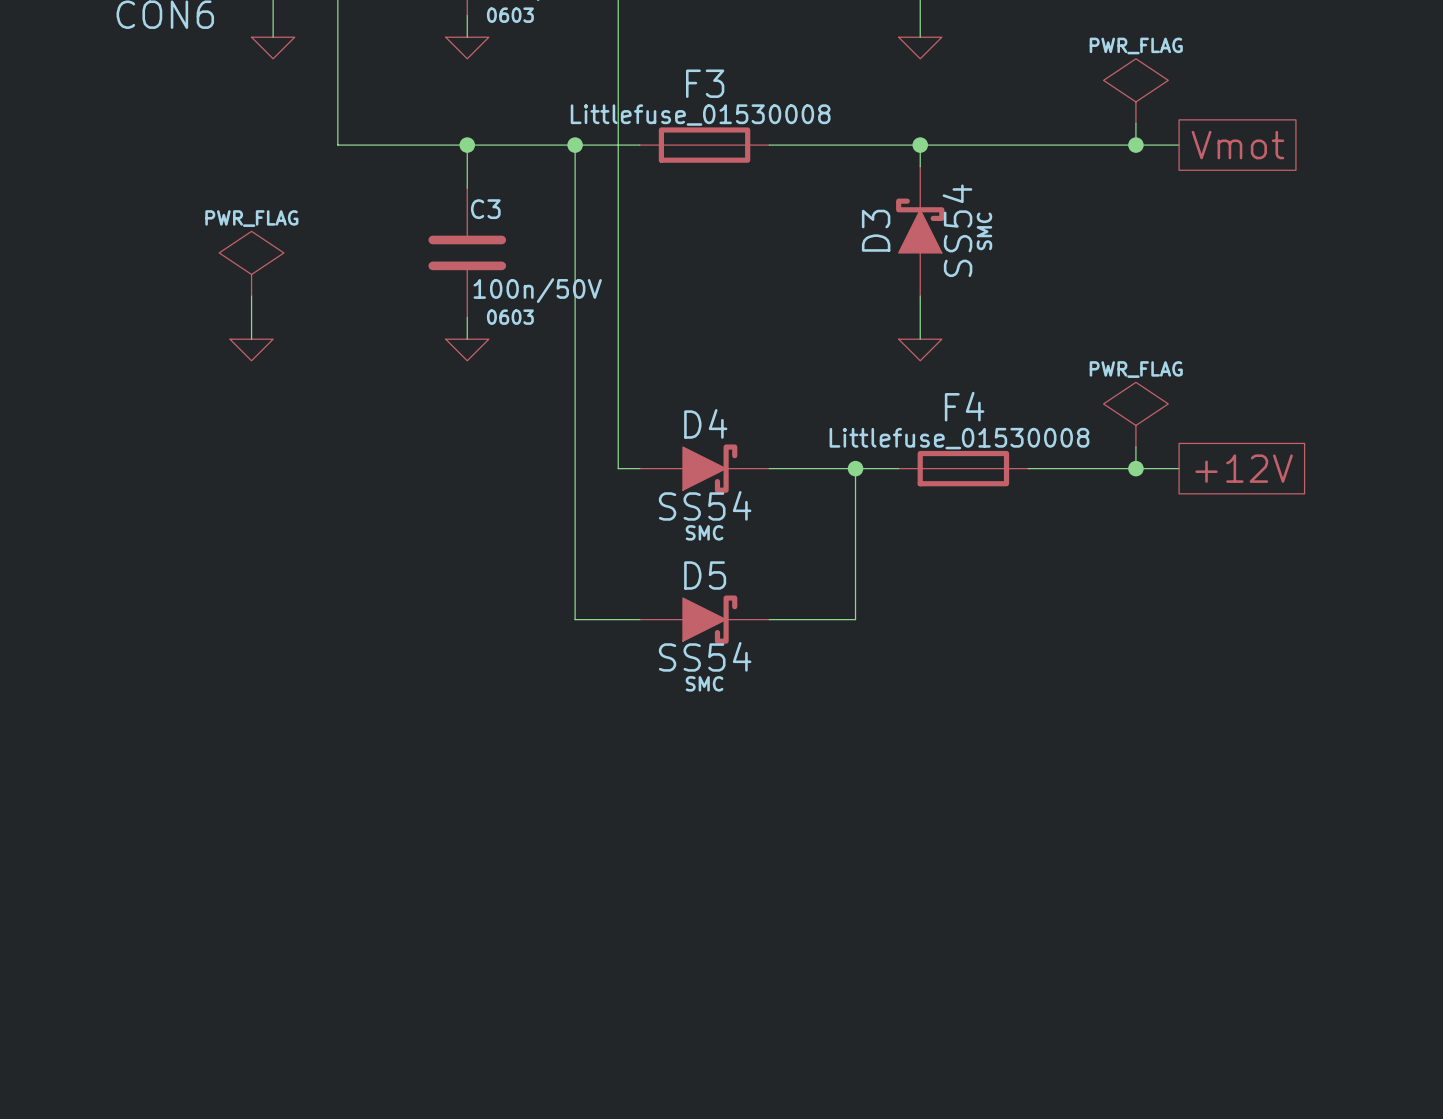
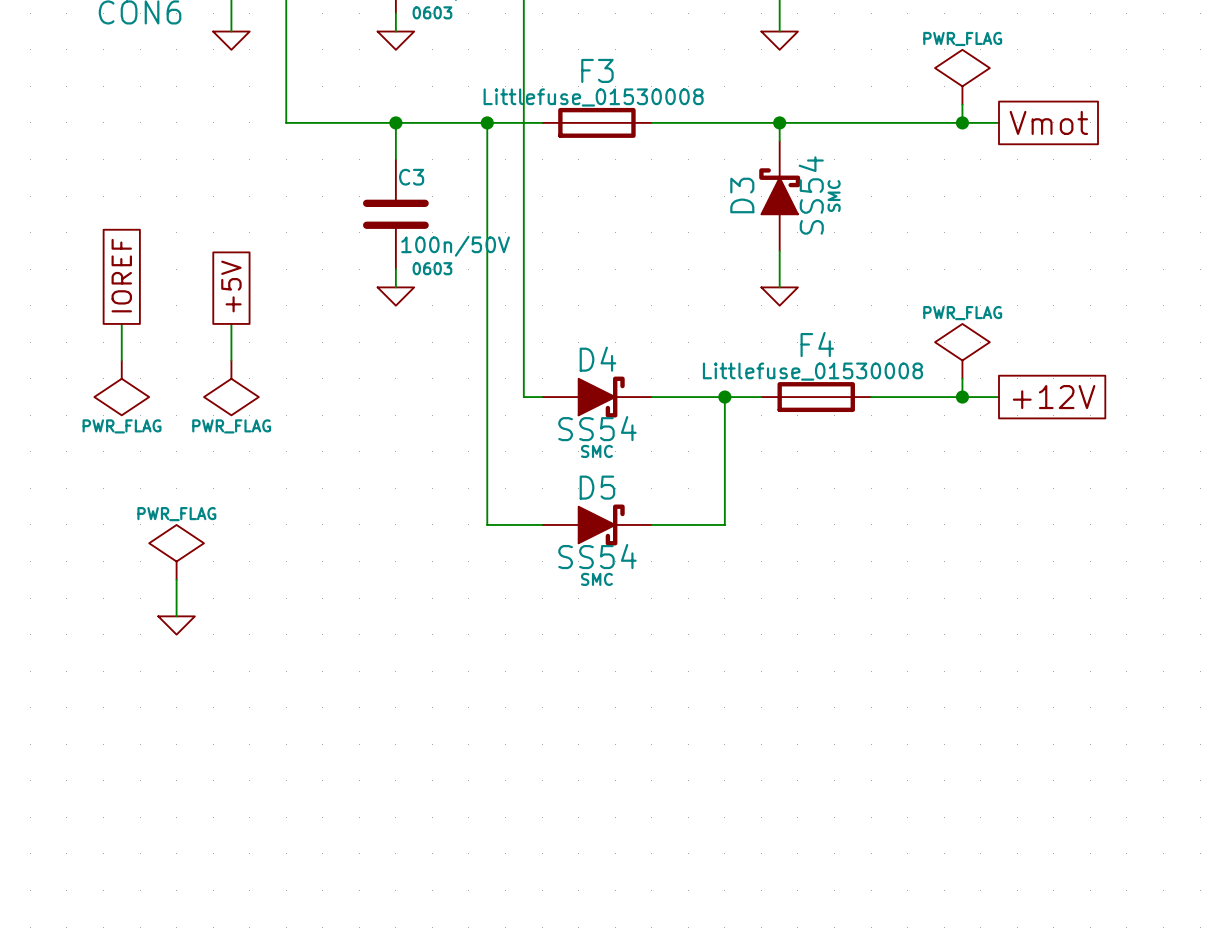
power symbol: PWR_FLAG (251, 263) -> none
wire: (251, 296) (251, 339) -> (231, 323) (231, 360)
global label: none -> IOREF (121, 275)
global label: none -> +5V (231, 286)
power symbol position: (251, 349) -> (176, 625)
wire: none -> (121, 323) (121, 360)
power symbol: none -> PWR_FLAG (121, 387)
power symbol: none -> PWR_FLAG (231, 387)
power symbol: none -> PWR_FLAG (176, 552)
wire: none -> (176, 579) (176, 616)

